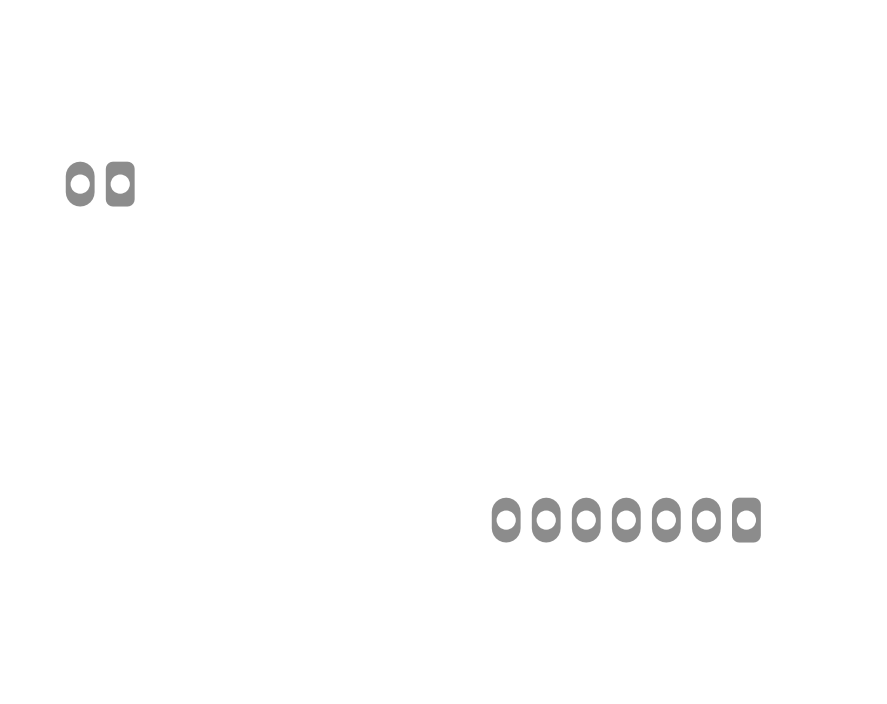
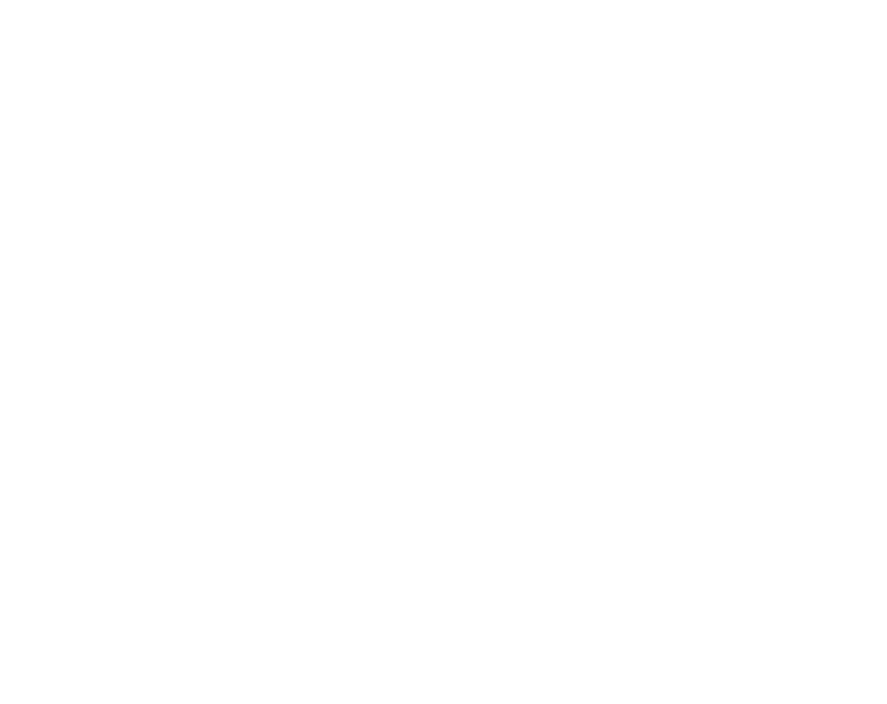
part: (100, 184) -> none
part: (626, 520) -> none

